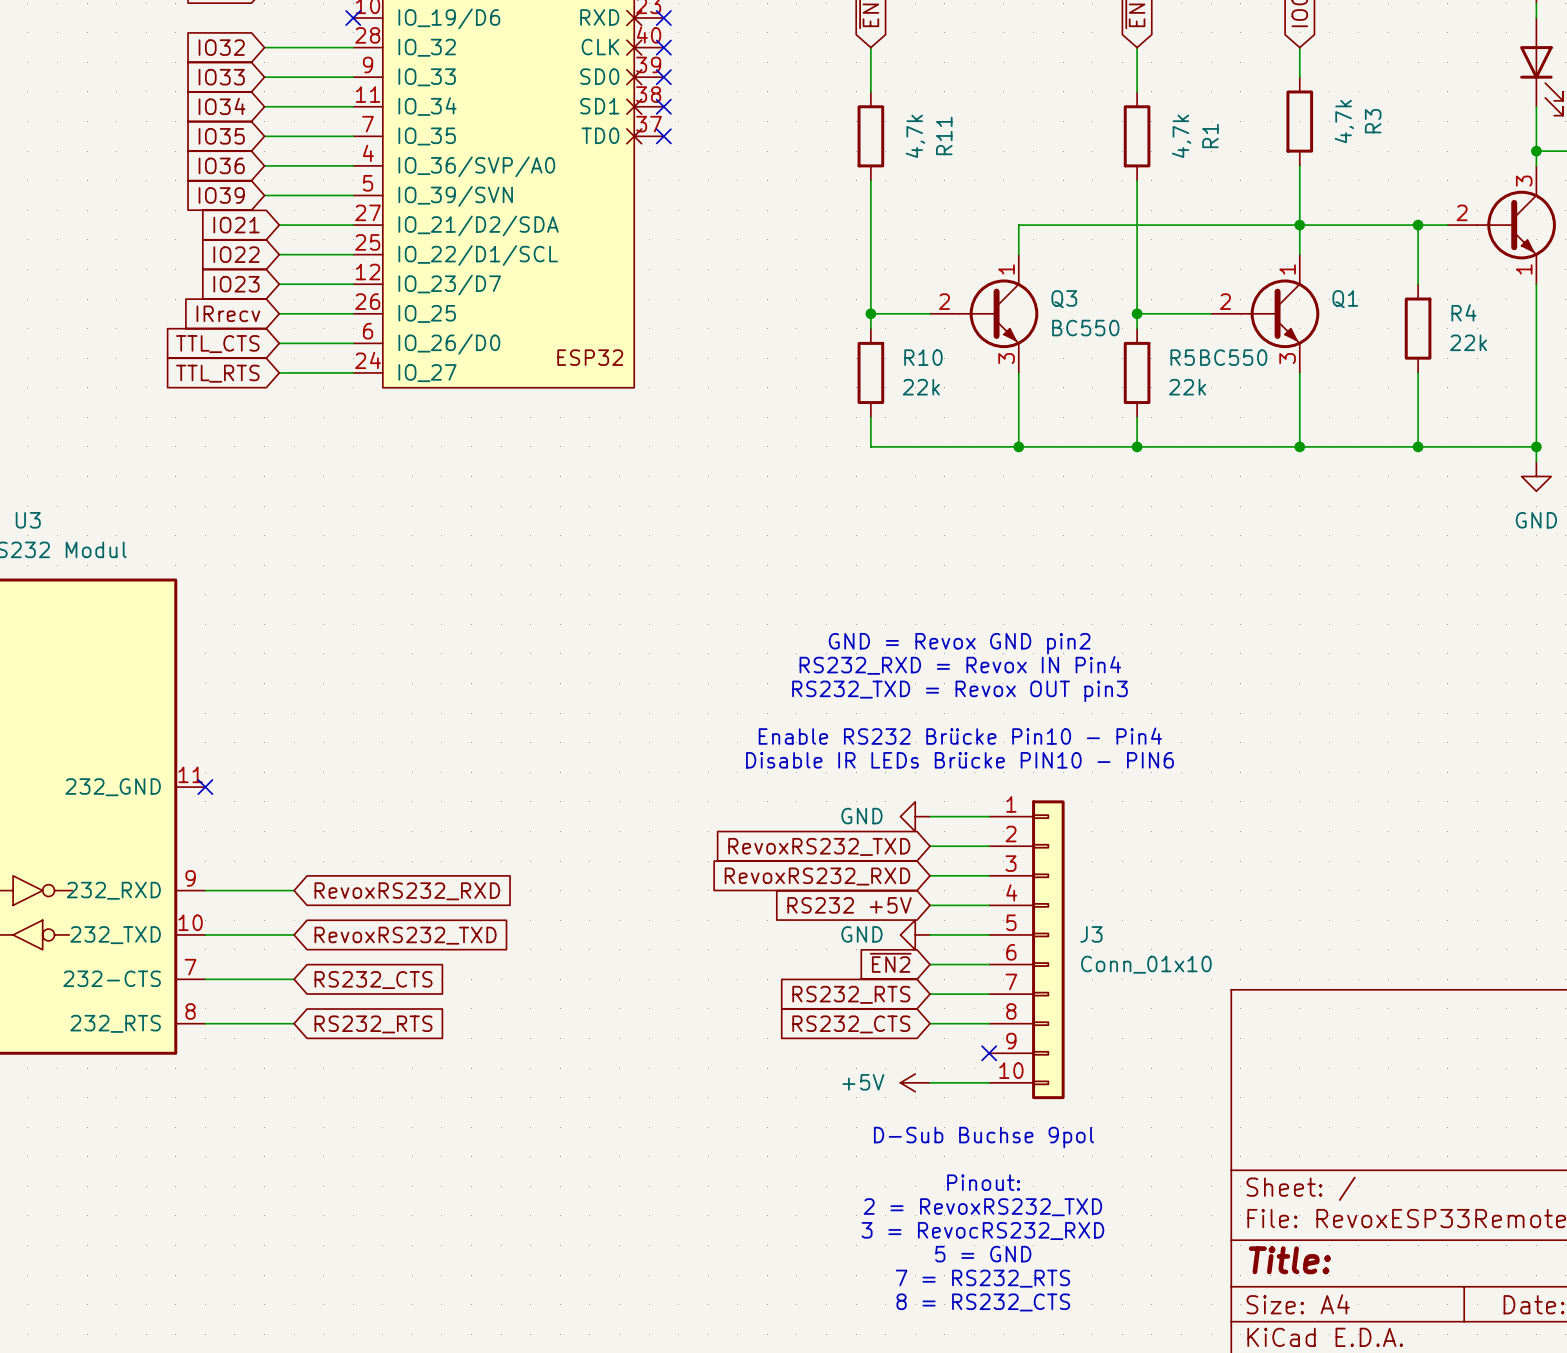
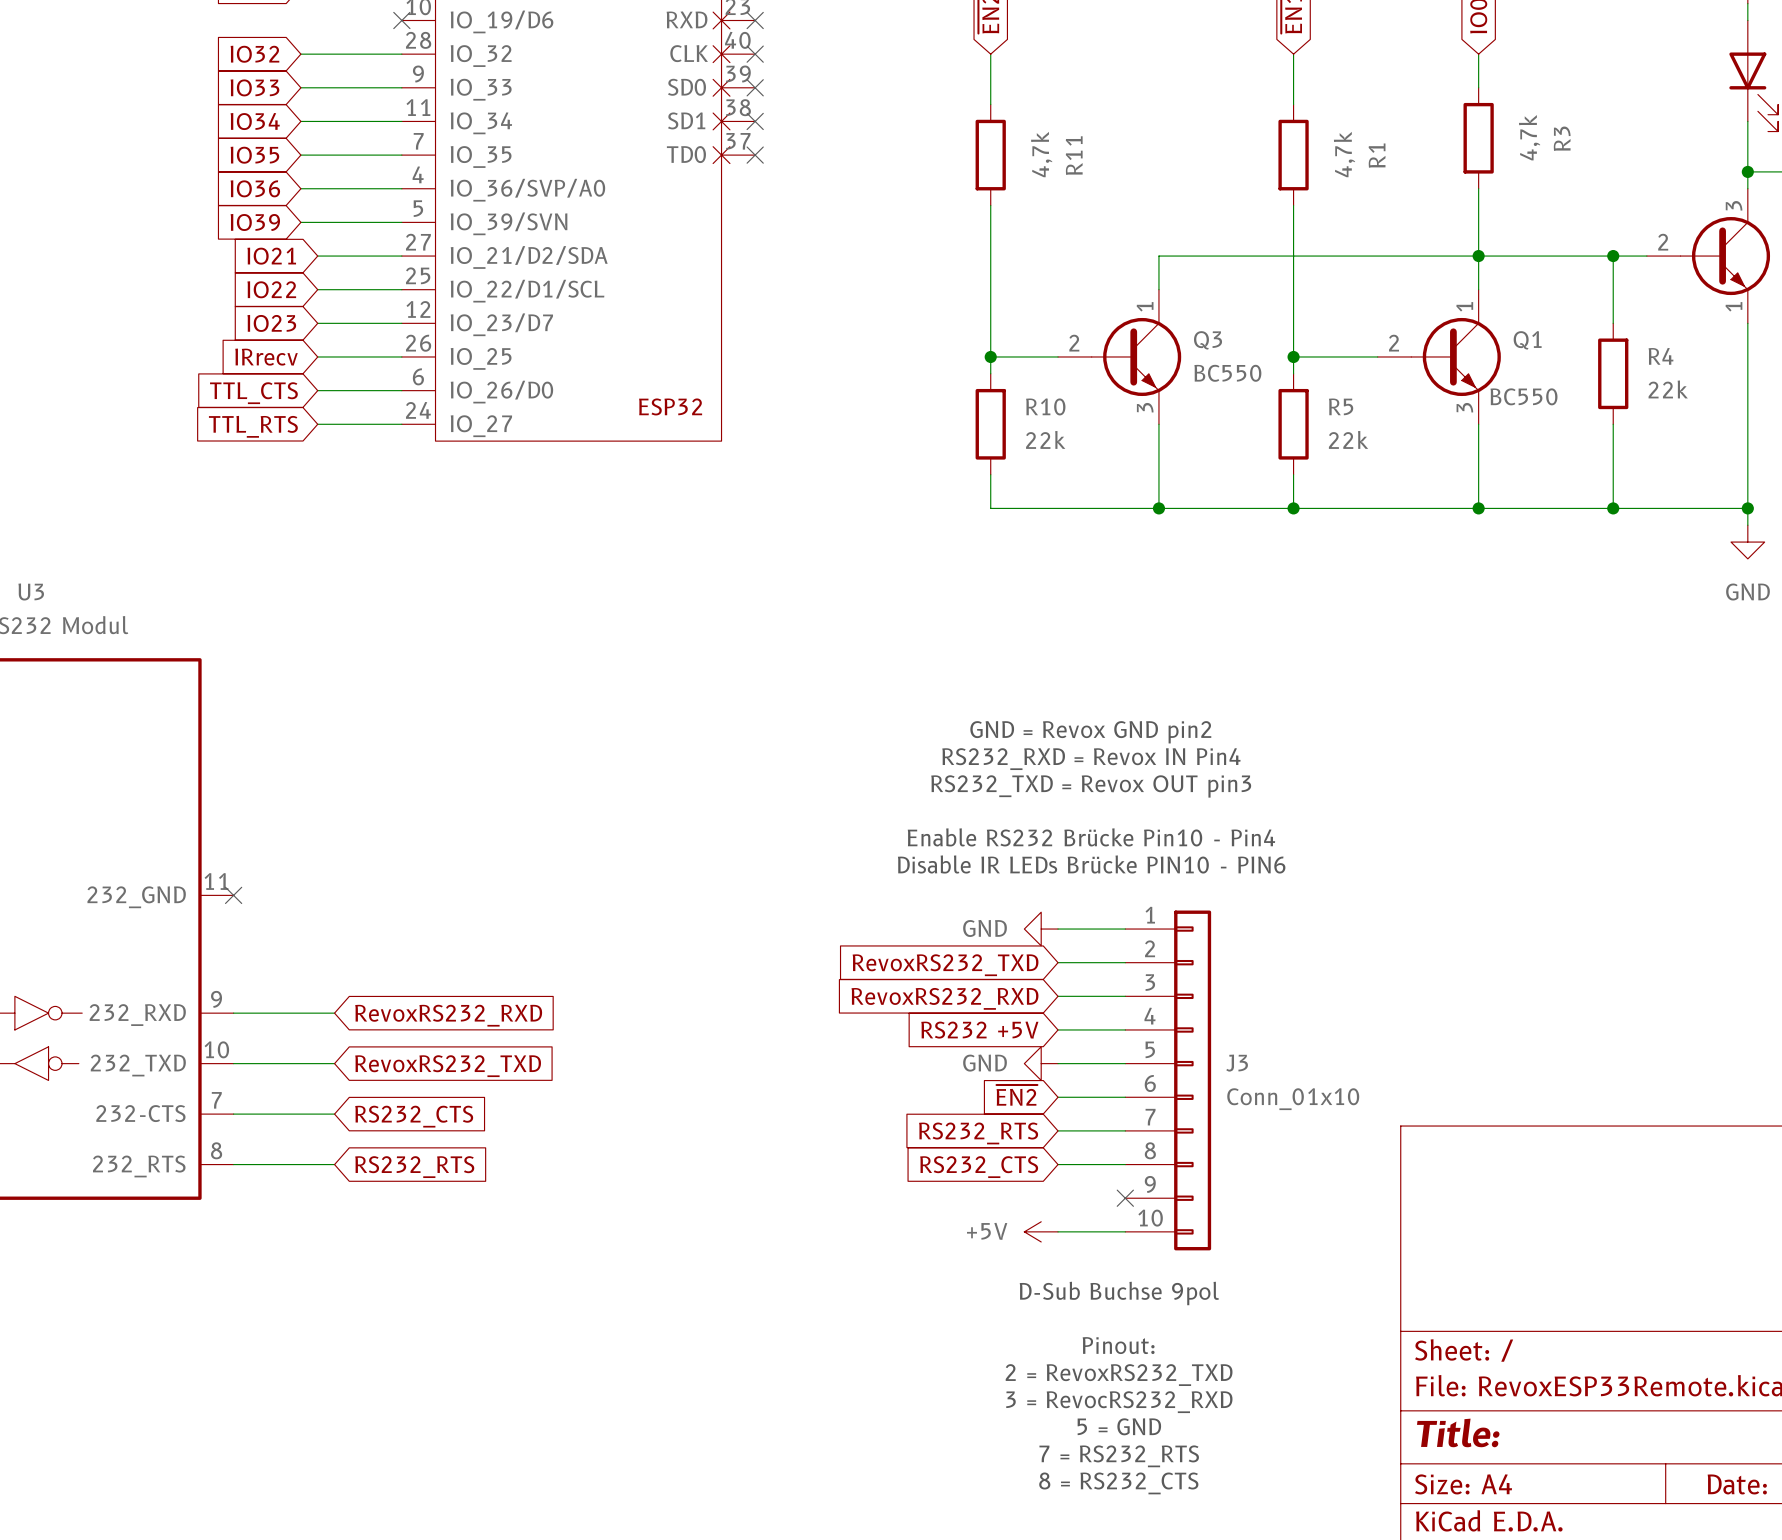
Q1 value position: BC550 (1233, 357) -> BC550 (1523, 396)

